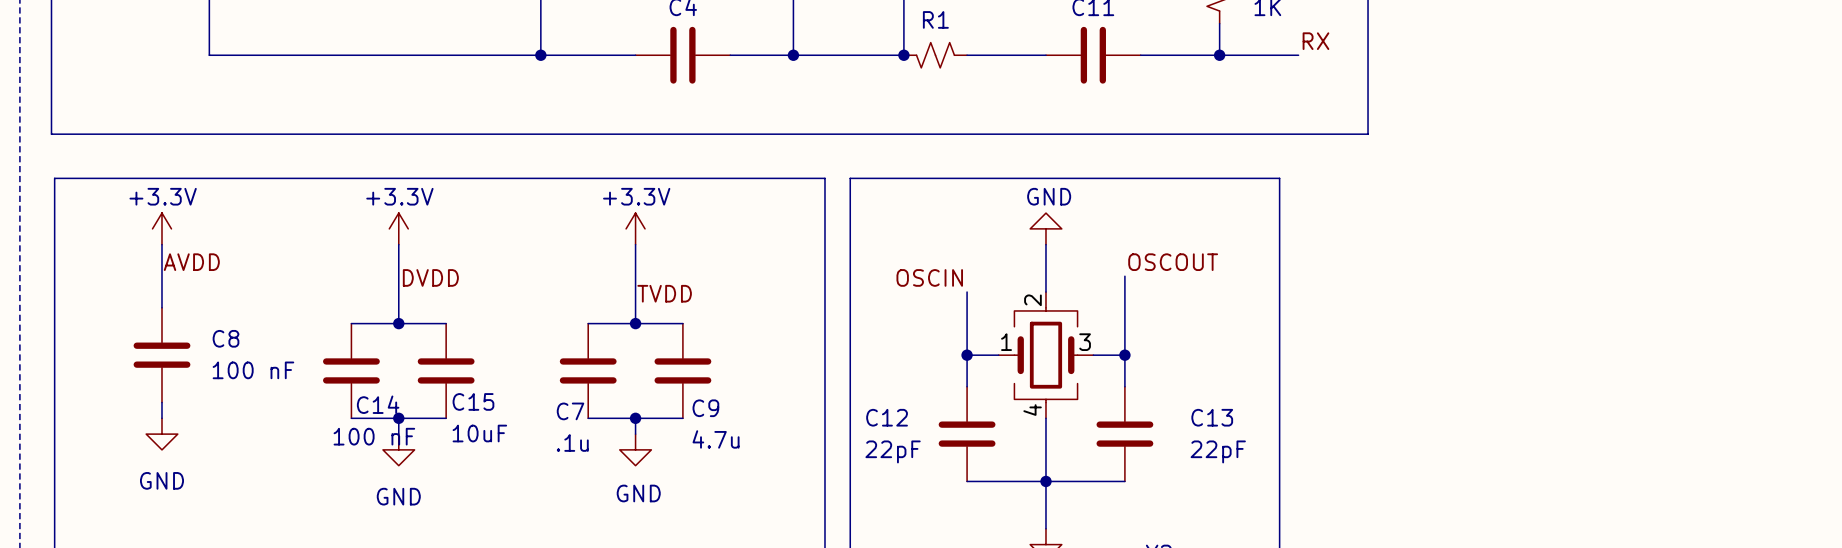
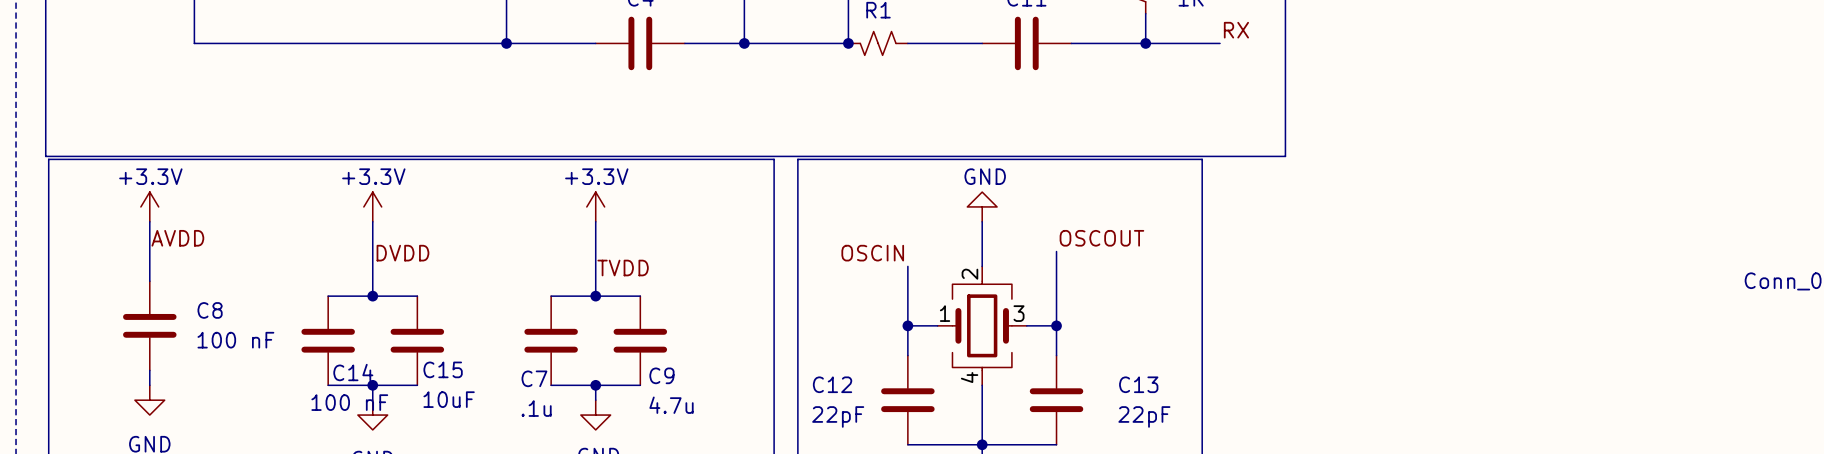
line: (51, 134) (1368, 134) -> (45, 117) (45, 156) (1285, 156) (1285, 117)

